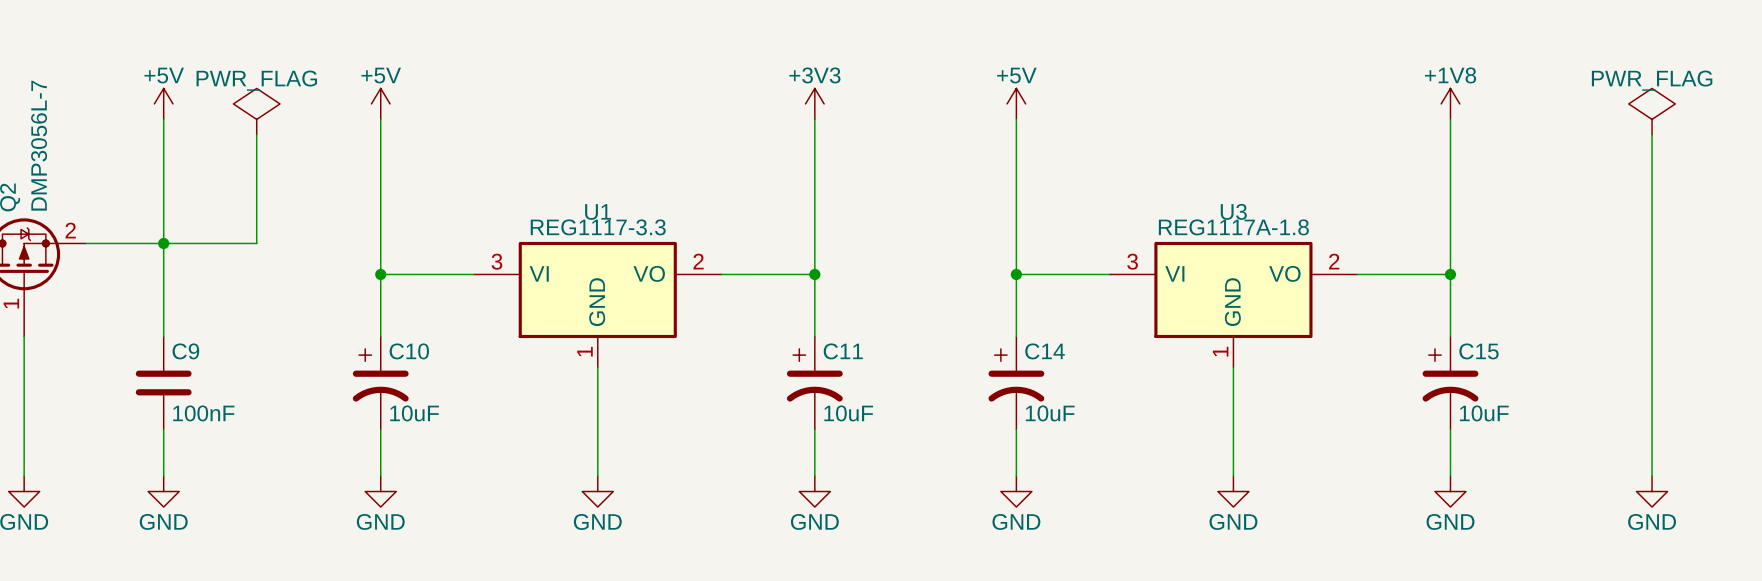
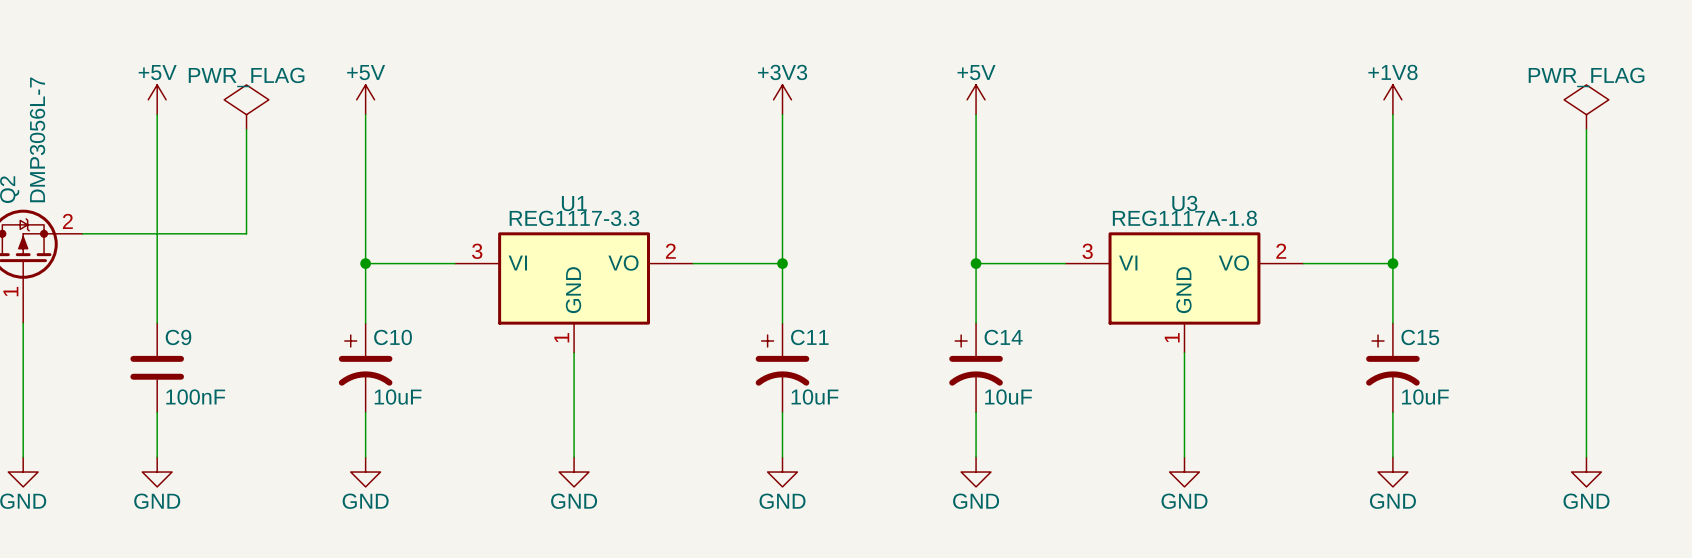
junction: (163, 243) -> none

